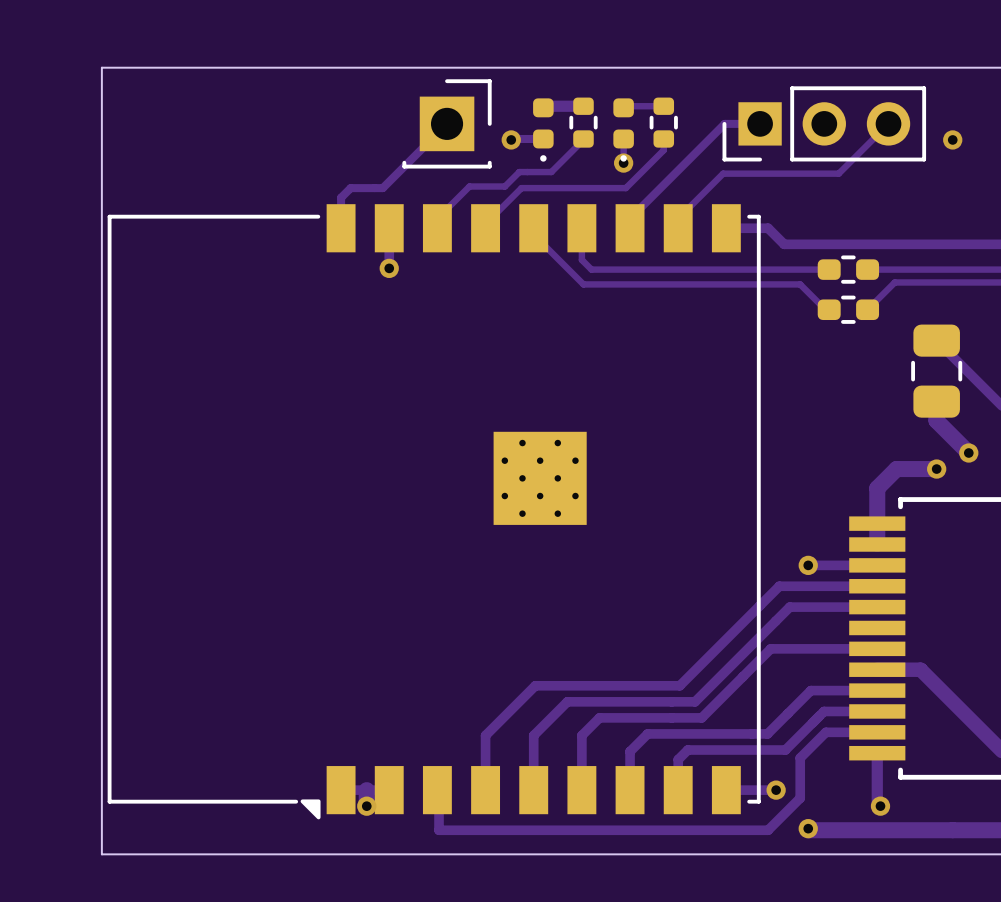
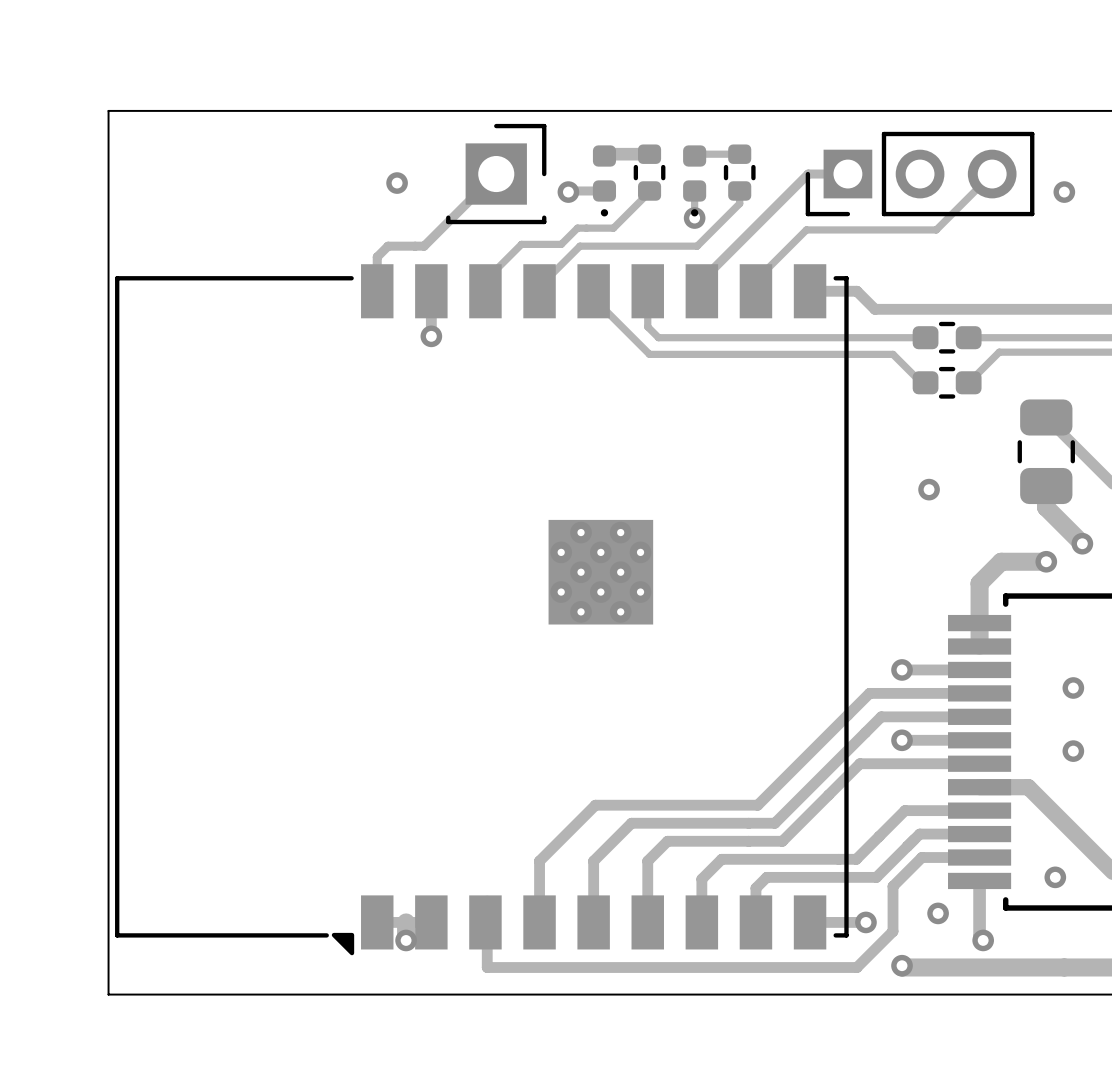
via: none -> (397, 183)
via: none -> (929, 489)
via: none -> (1073, 687)
track: none -> (902, 740) (979, 740)
via: none -> (902, 740)
via: none -> (1073, 751)
via: none -> (1055, 877)
via: none -> (938, 913)

